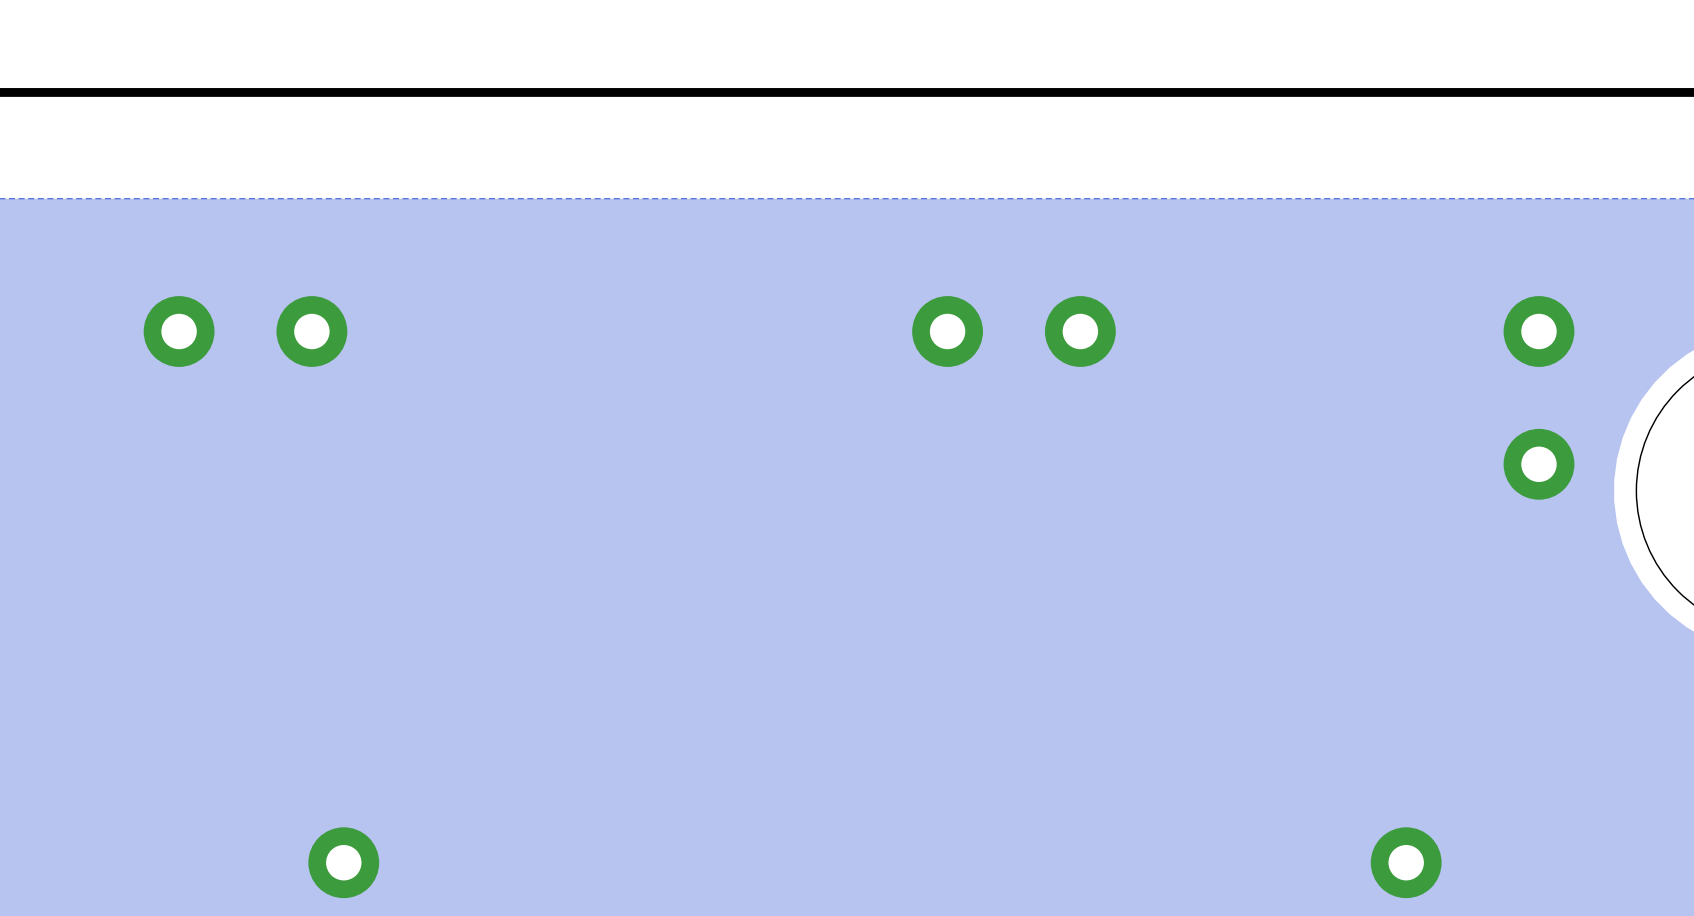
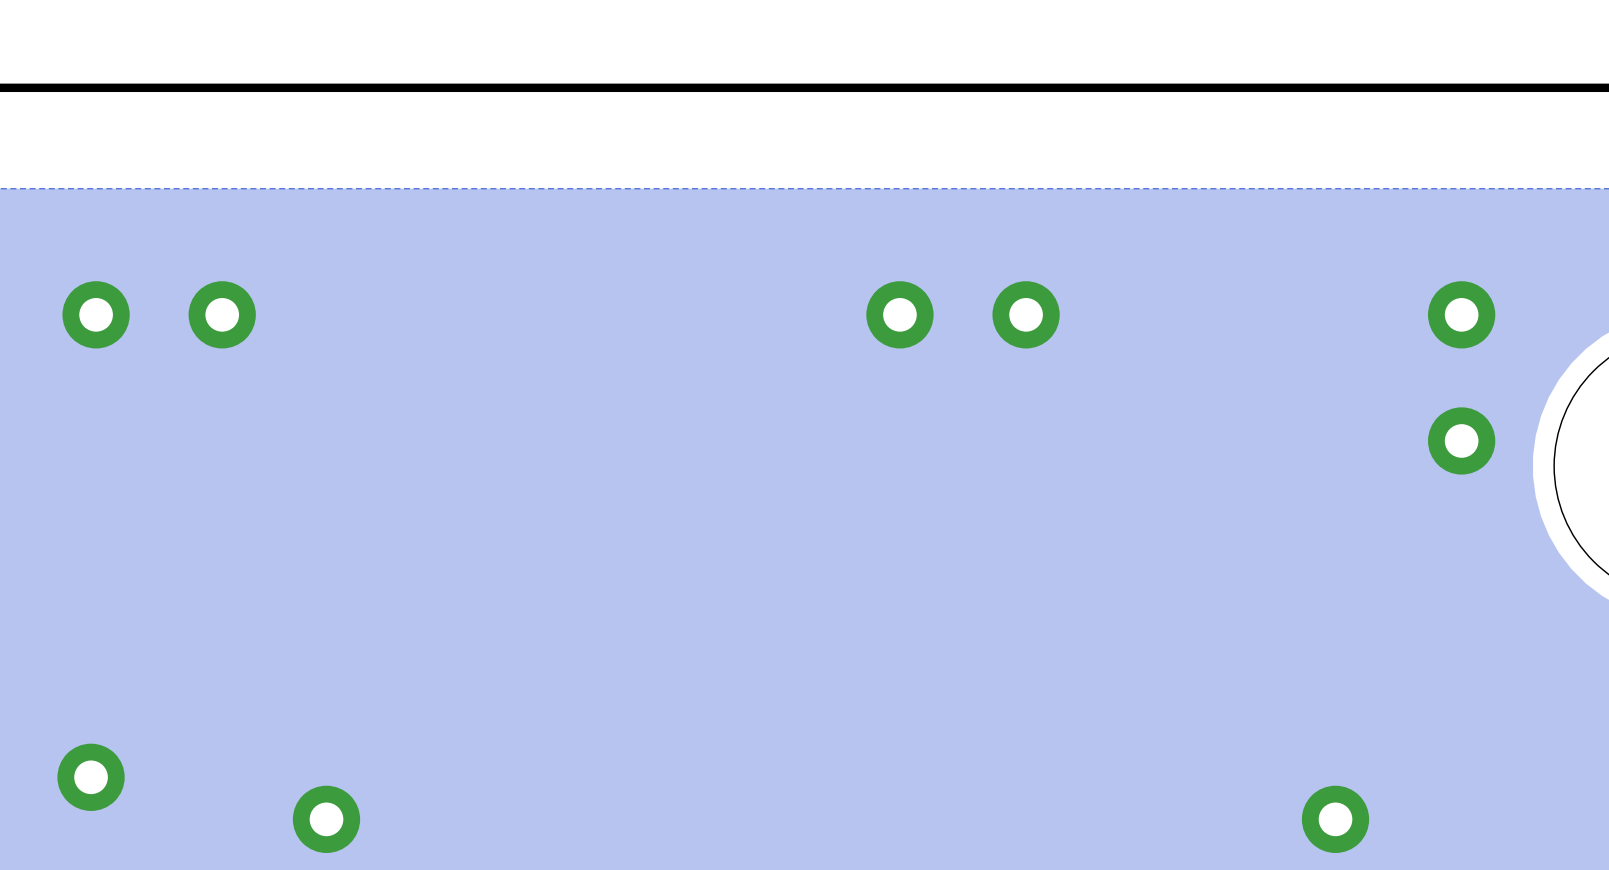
via: none -> (96, 314)
via position: (179, 331) -> (222, 314)
via: (311, 331) -> none
via: none -> (91, 777)

